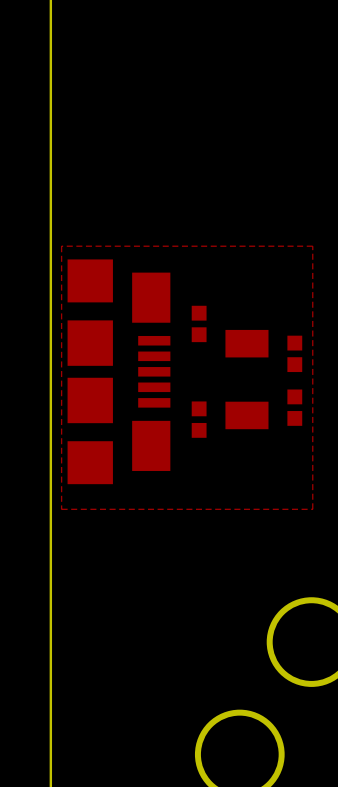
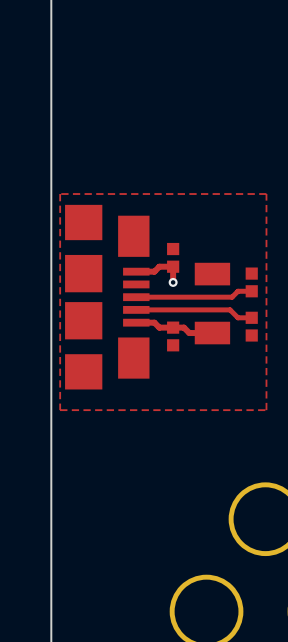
top track: none -> (136, 271) (154, 271) (159, 266) (173, 266) (173, 282)
via: none -> (173, 282)
top track: none -> (251, 291) (237, 291) (232, 297) (136, 297)
top track: none -> (136, 309) (230, 309) (237, 317) (251, 317)
top track: none -> (136, 322) (154, 322) (159, 327) (183, 327) (189, 333) (212, 333)

